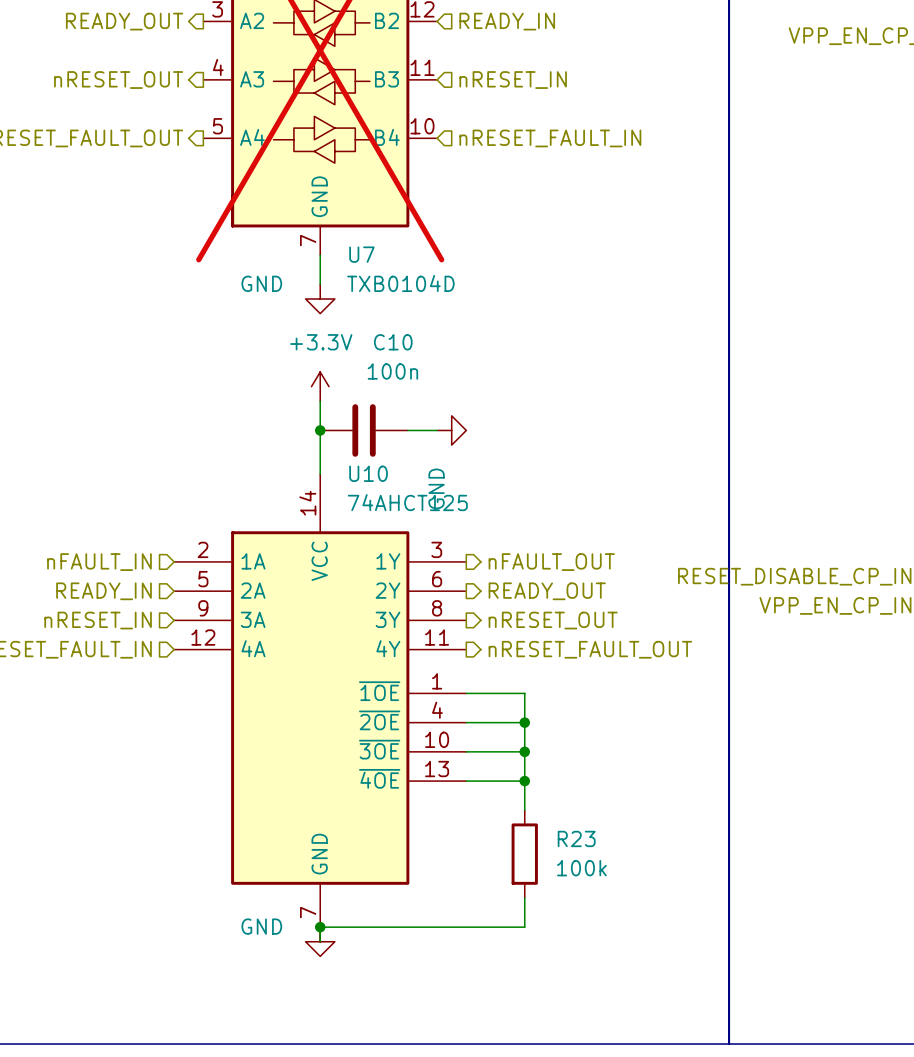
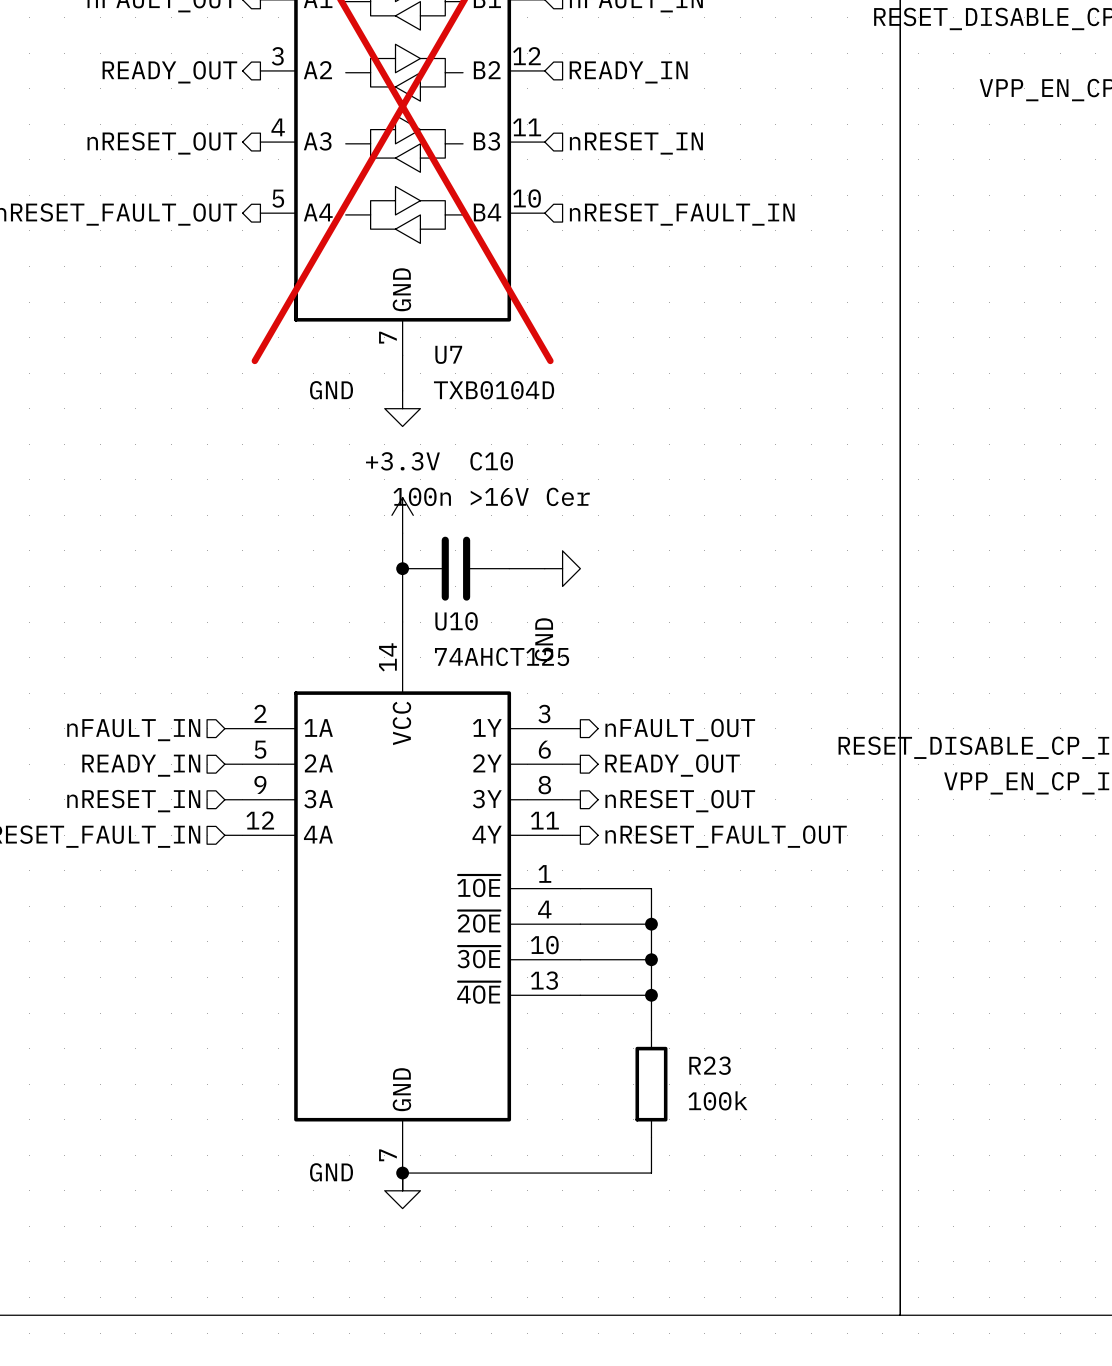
C10 value: 100n (392, 371) -> 100n >16V Cer (491, 496)

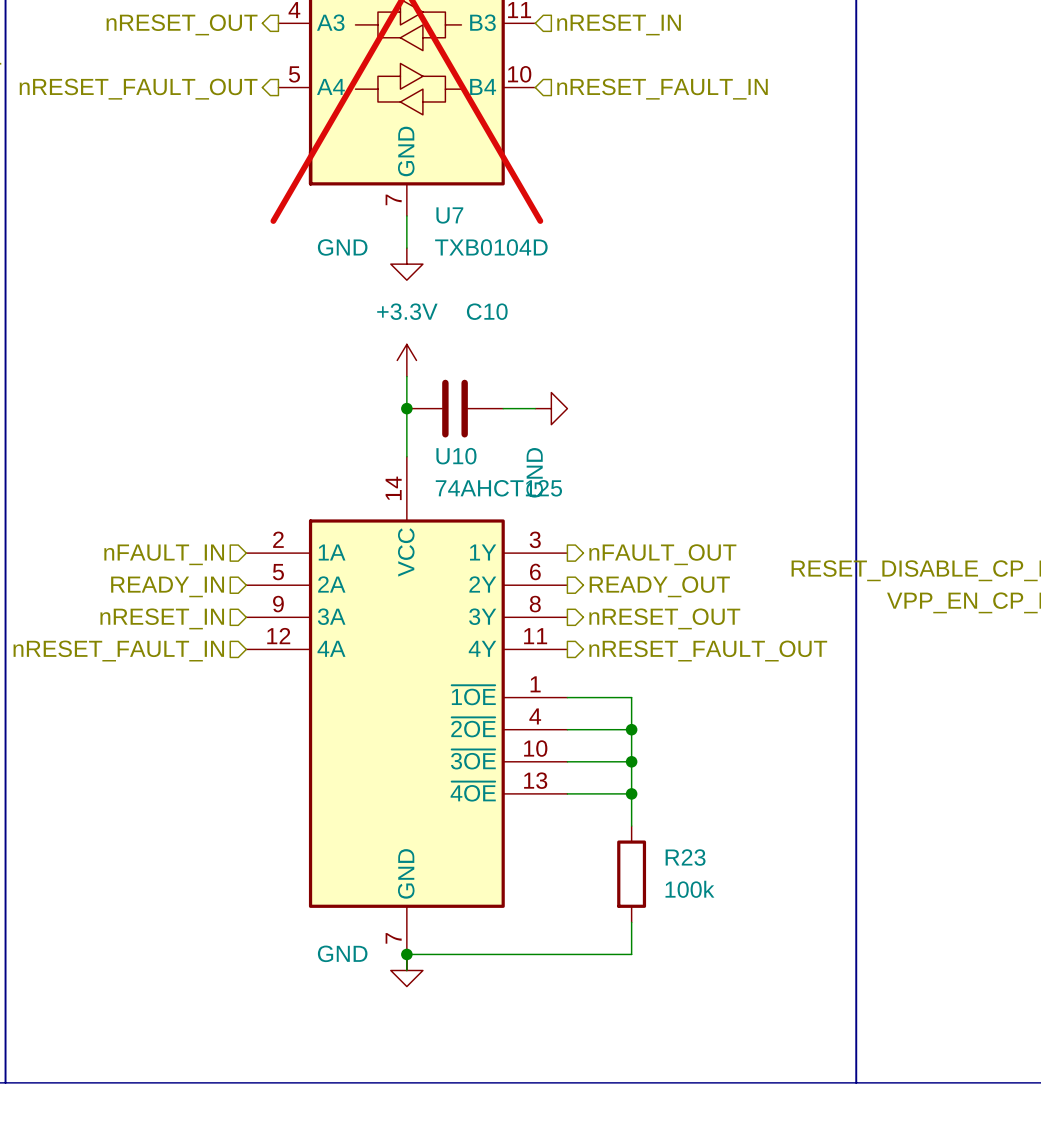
C10 value: 100n >16V Cer (491, 496) -> none

